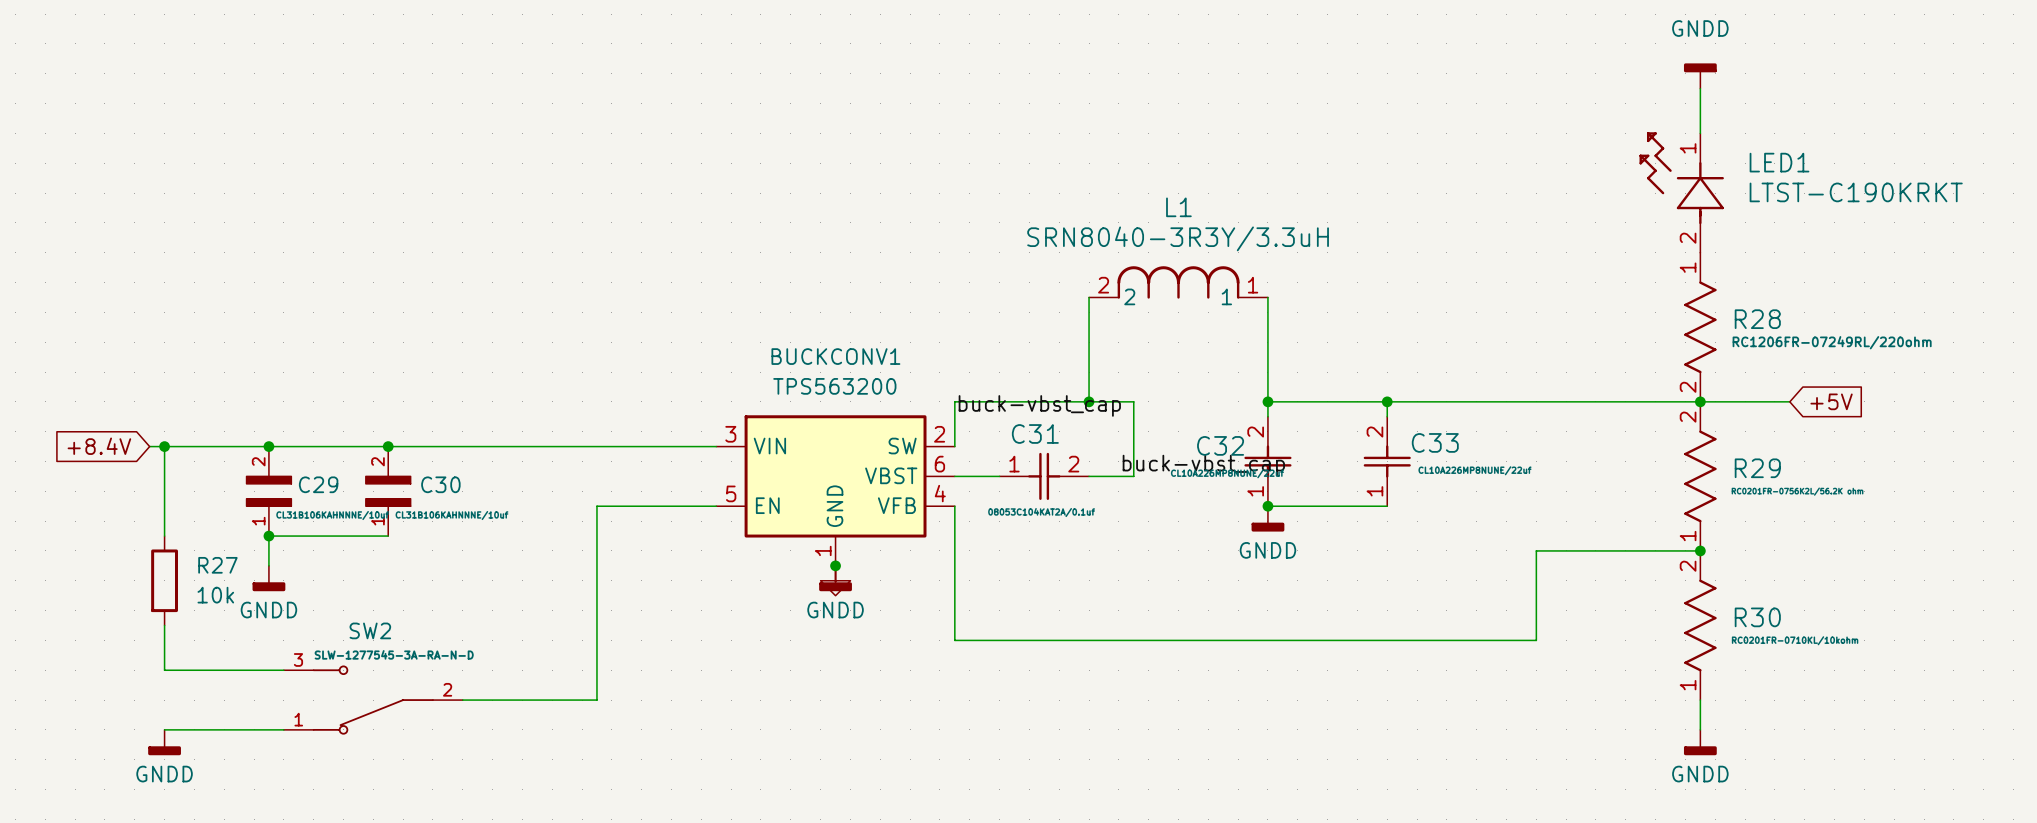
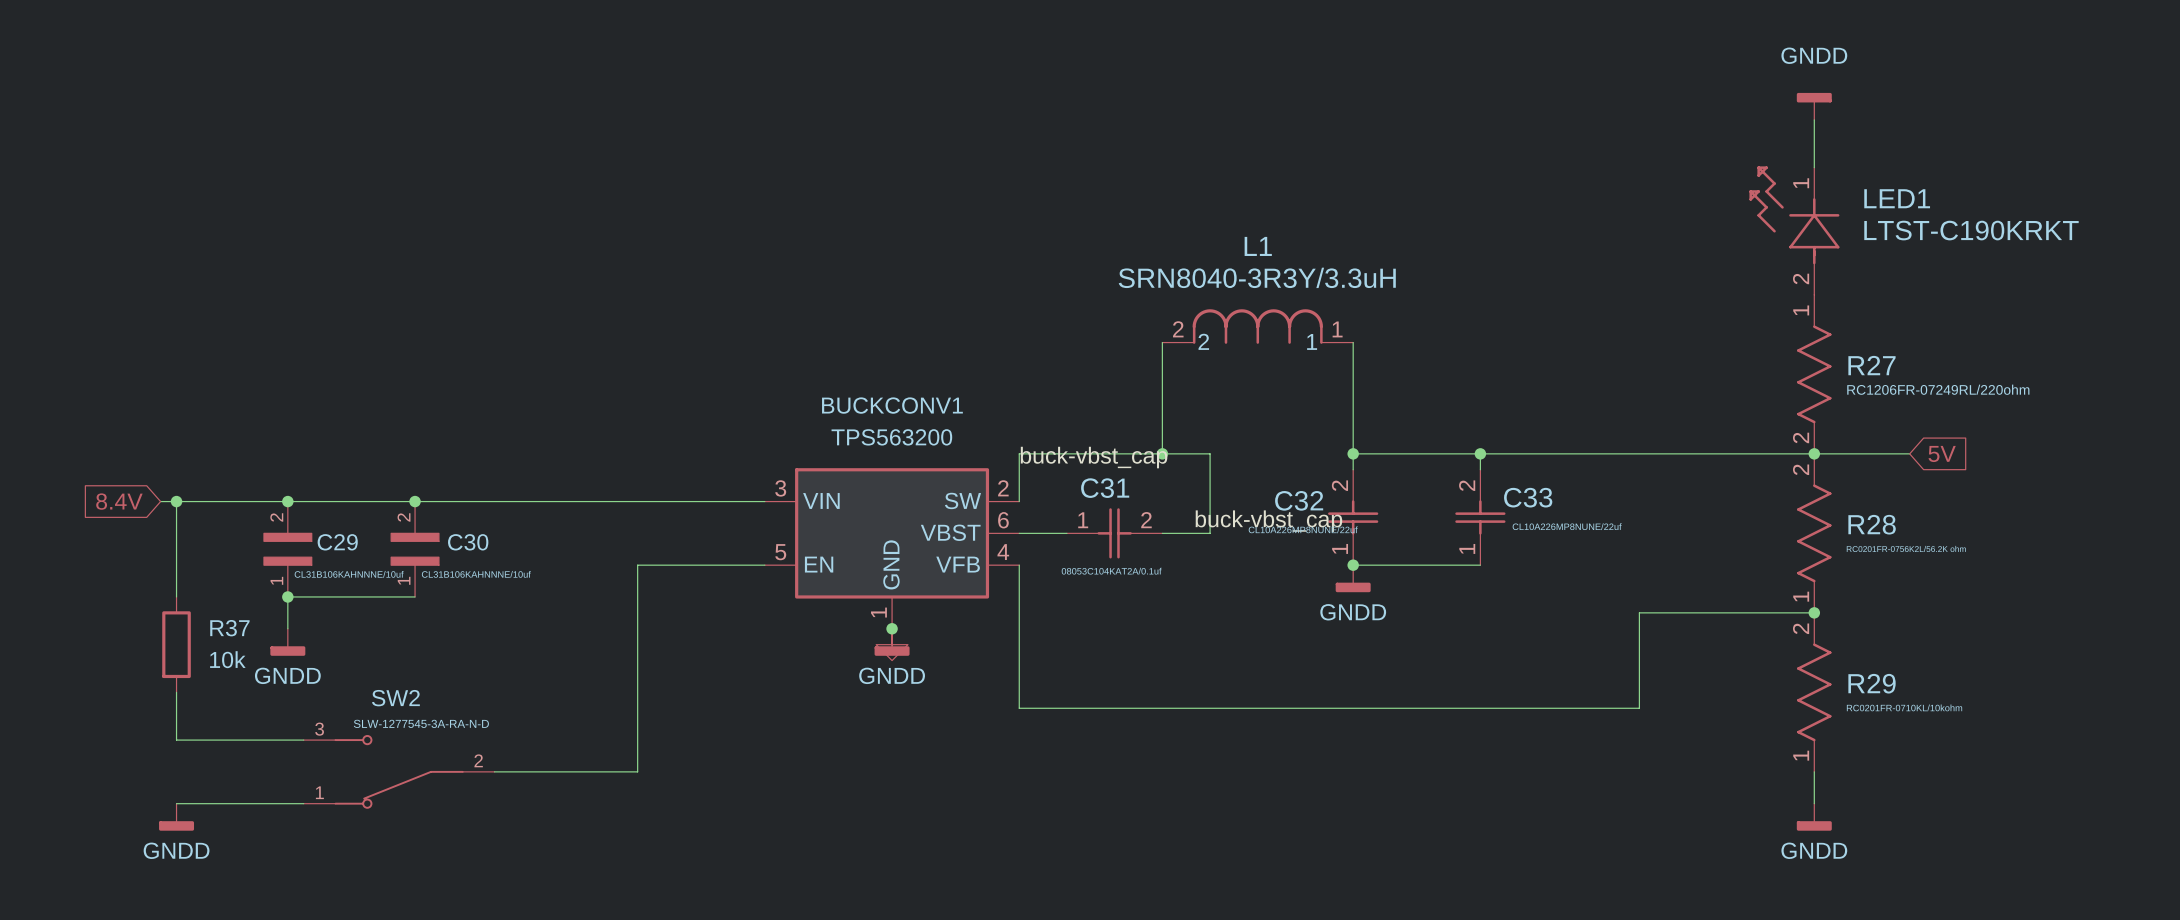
R28 name: R28 (1757, 319) -> R27 (1871, 365)
global label: +5V (1831, 401) -> 5V (1942, 453)
global label: +8.4V (99, 446) -> 8.4V (119, 501)
R29 name: R29 (1757, 468) -> R28 (1872, 524)
R27 name: R27 (217, 565) -> R37 (229, 628)
R30 name: R30 (1757, 617) -> R29 (1872, 683)

